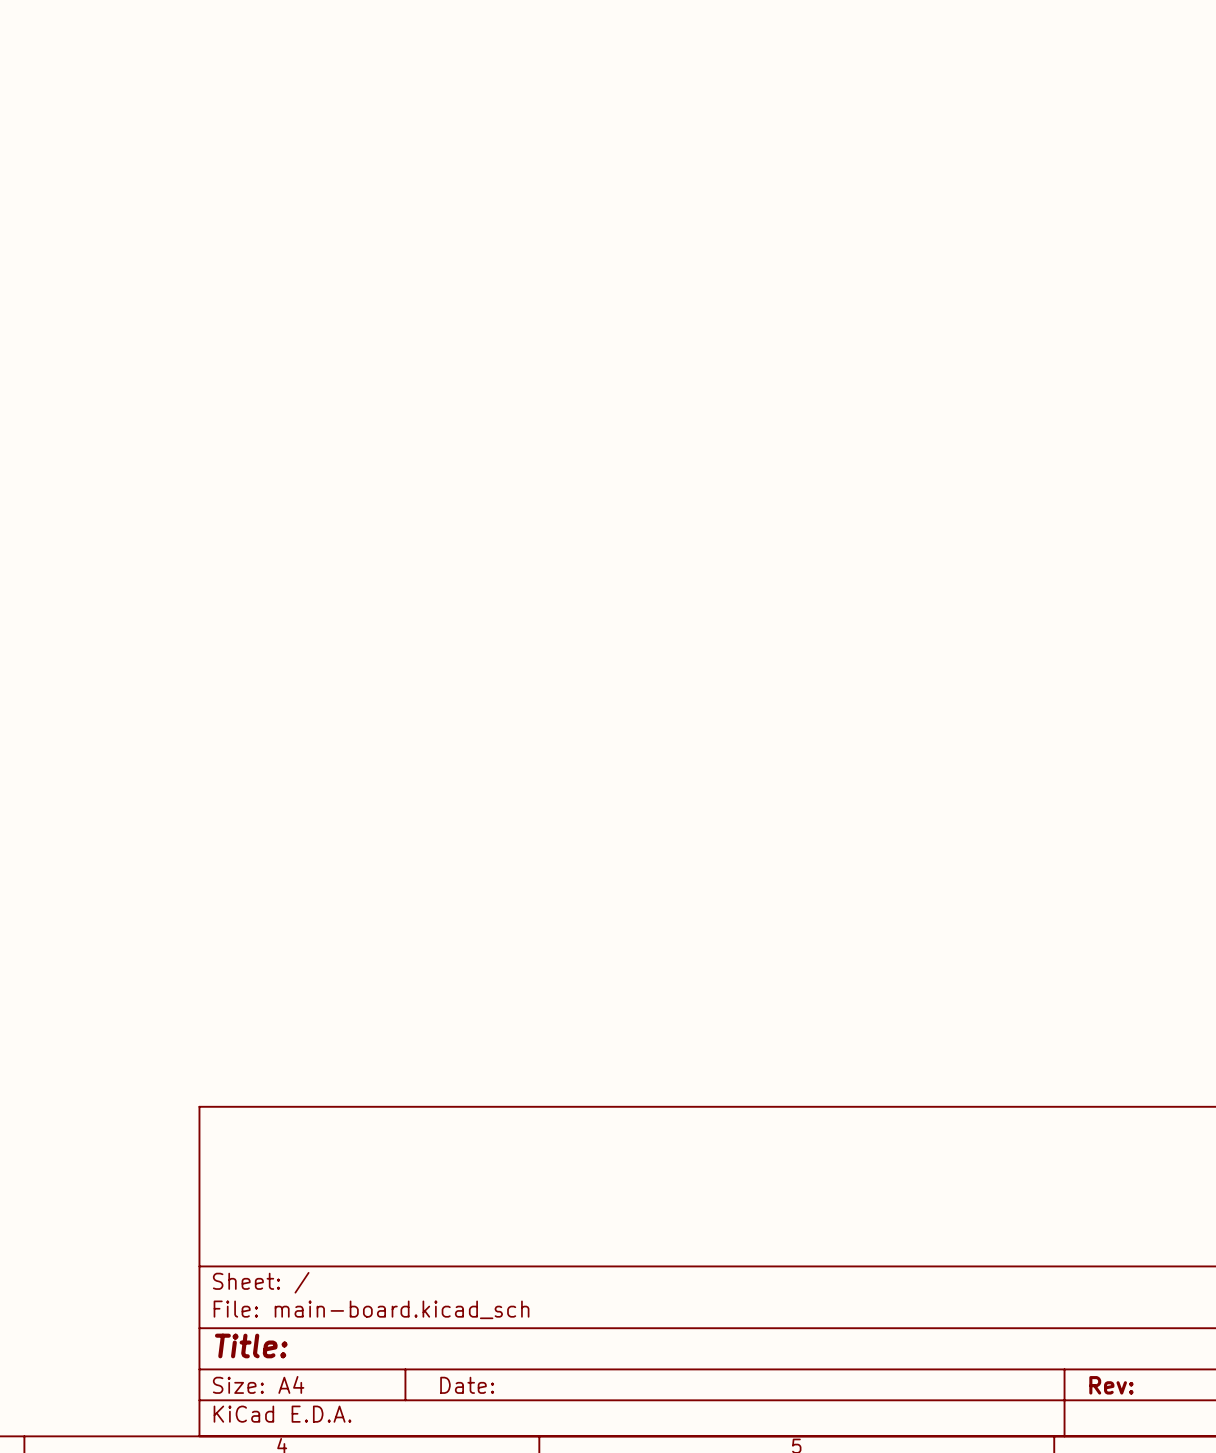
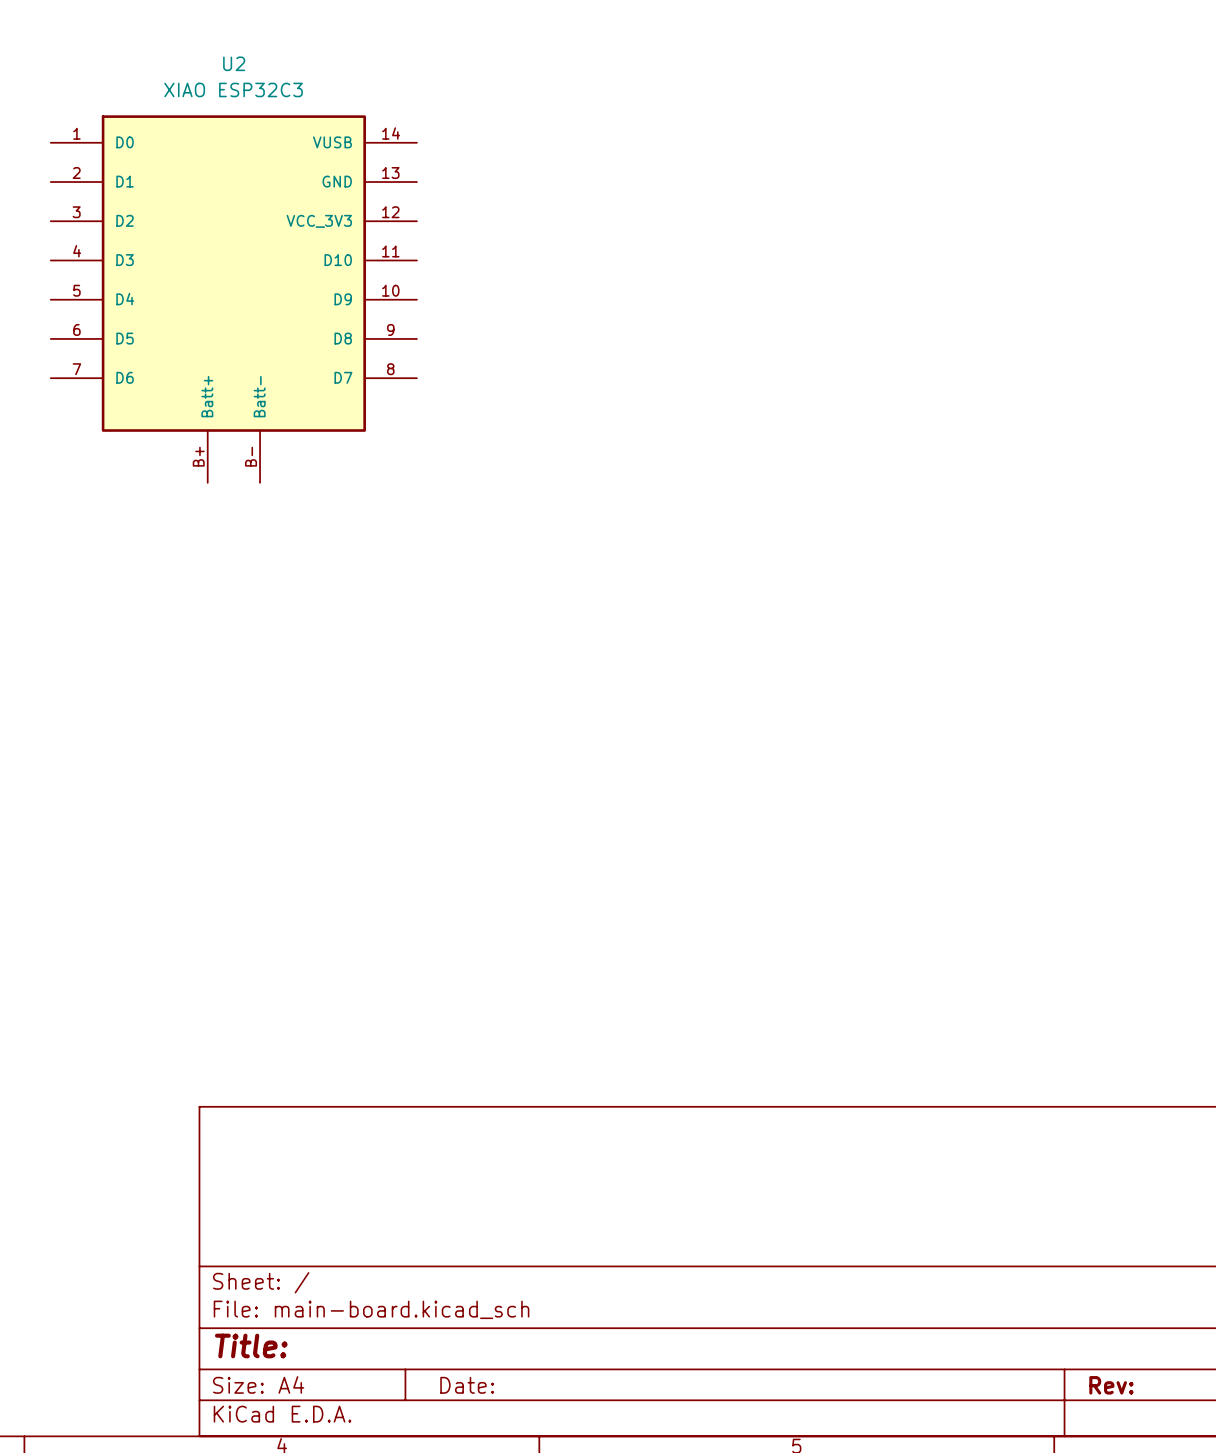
U2: none -> XIAO ESP32C3 (233, 299)

